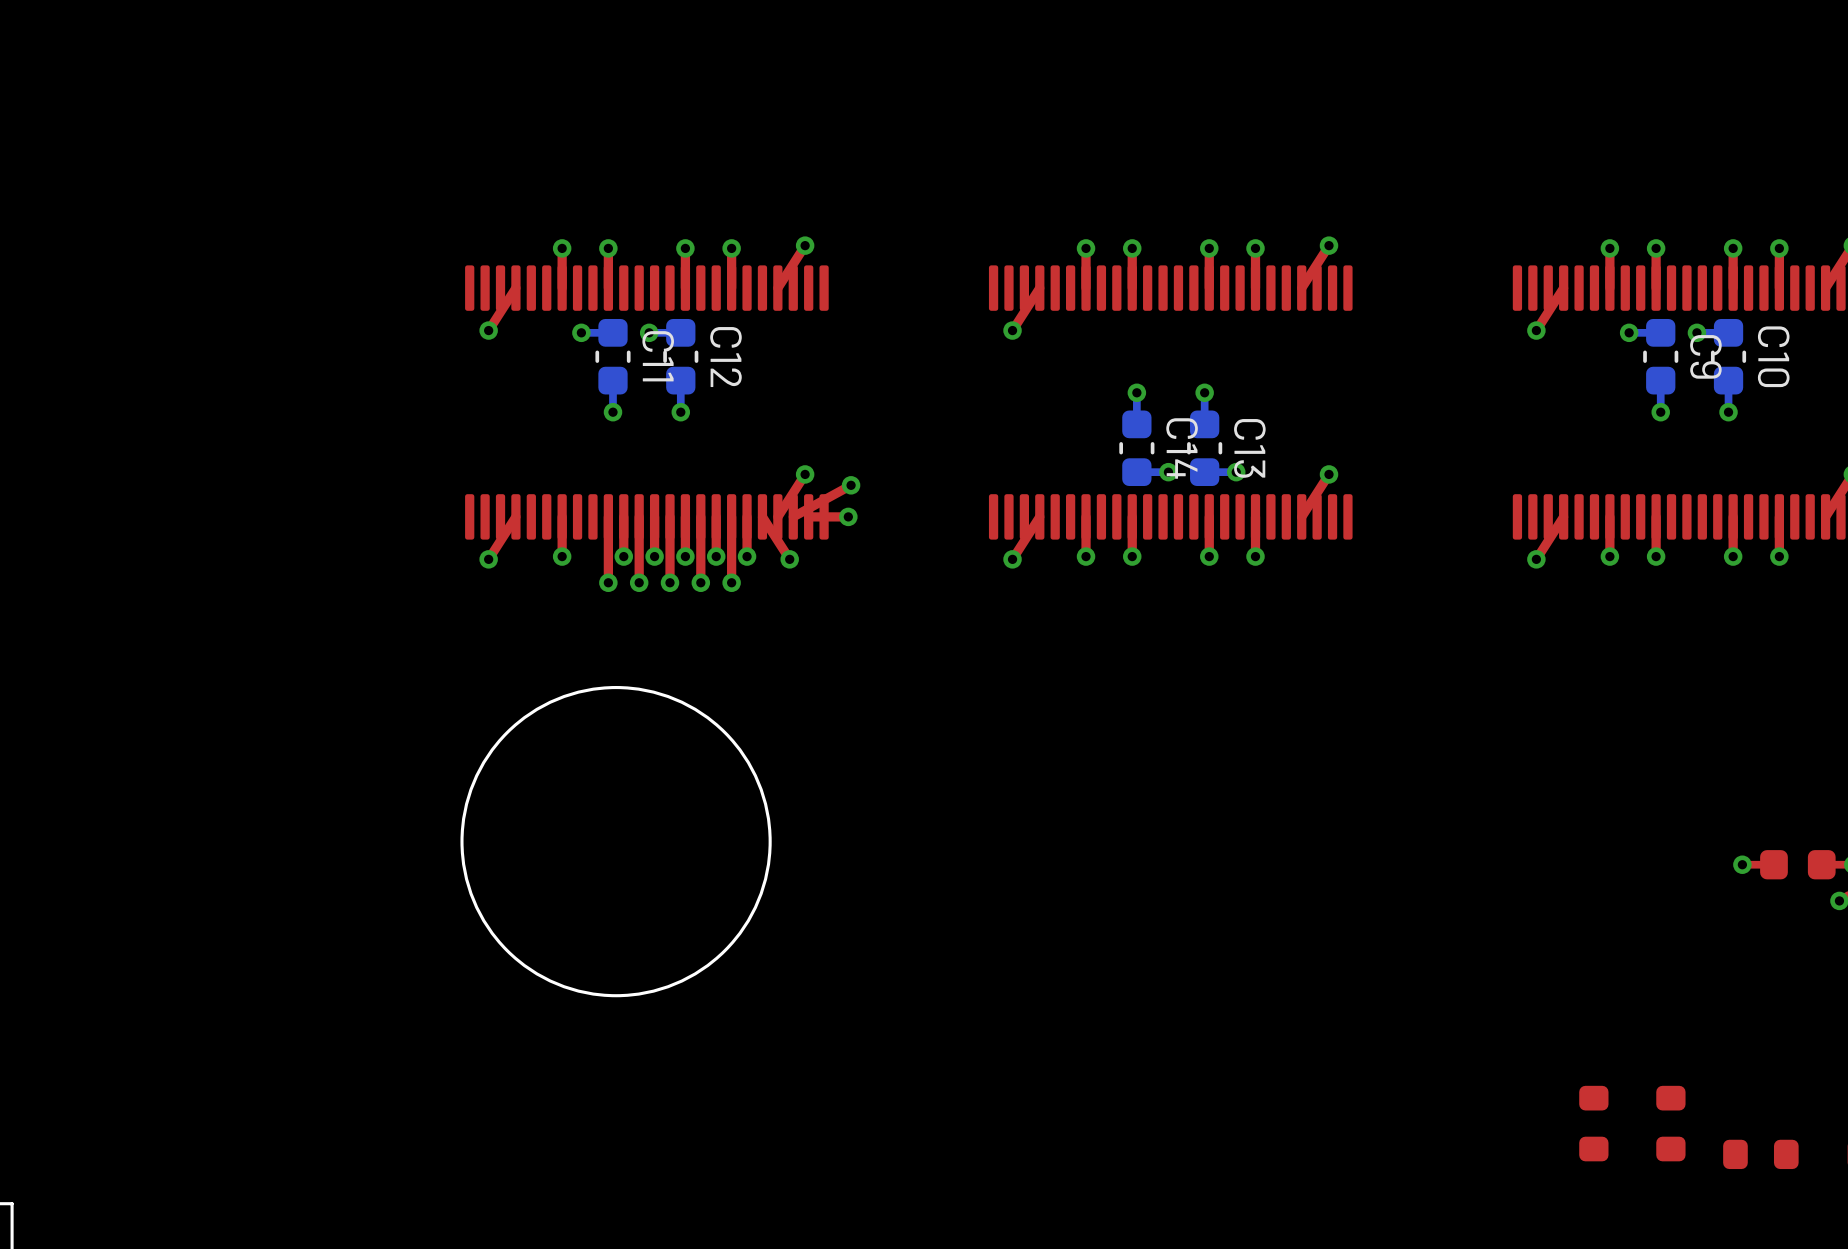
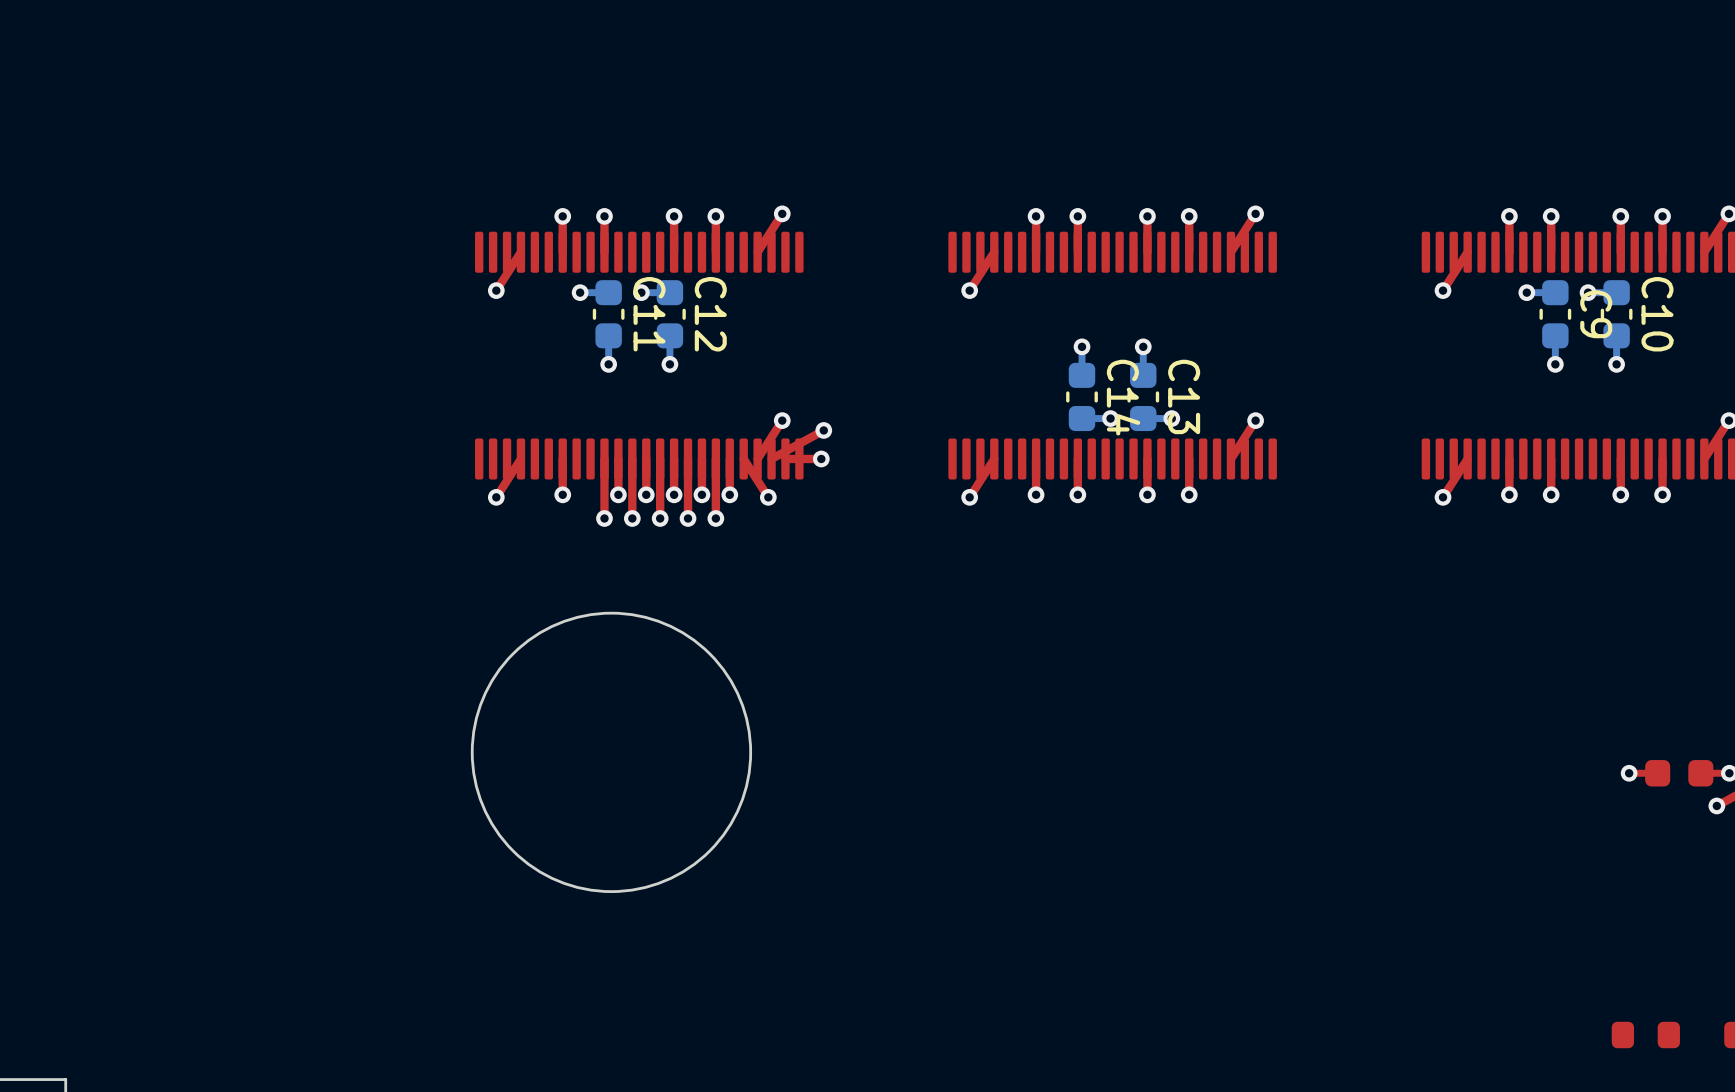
part: (1593, 1123) -> none
part: (1670, 1123) -> none

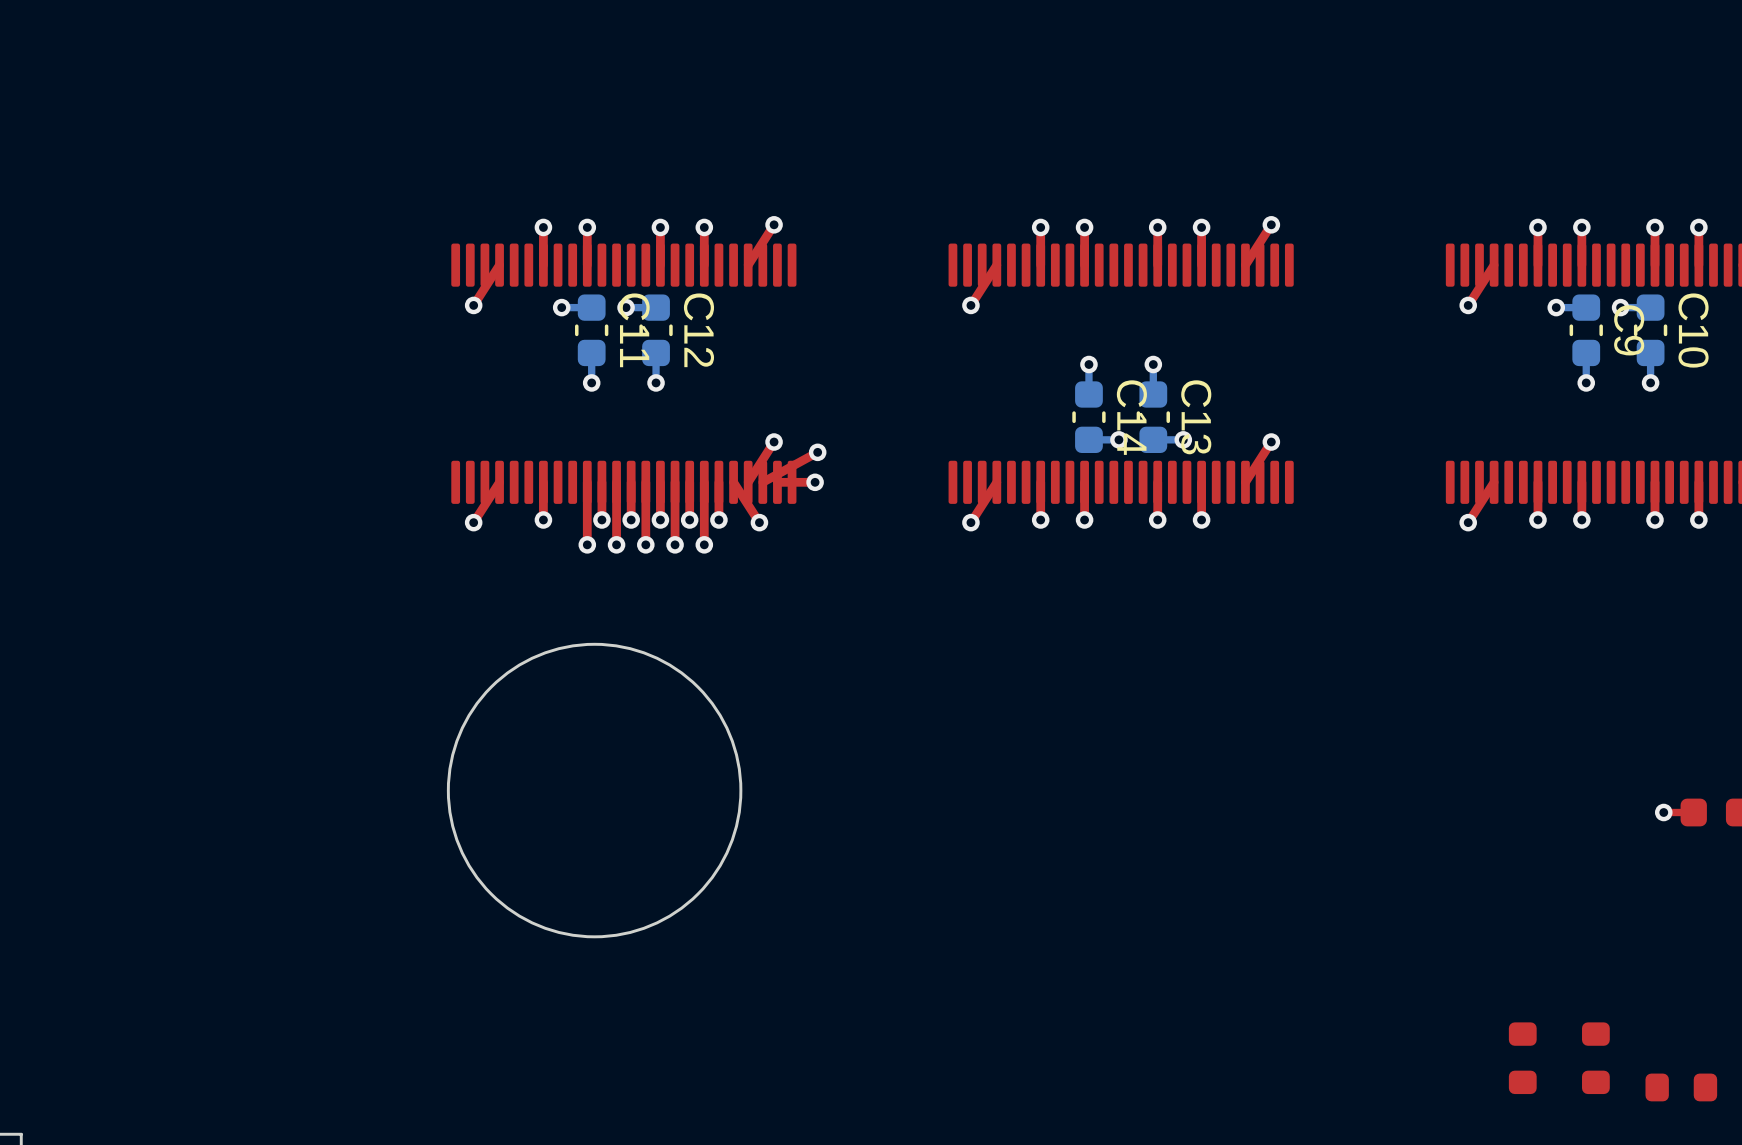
part: none -> (1522, 1058)
part: none -> (1595, 1058)

